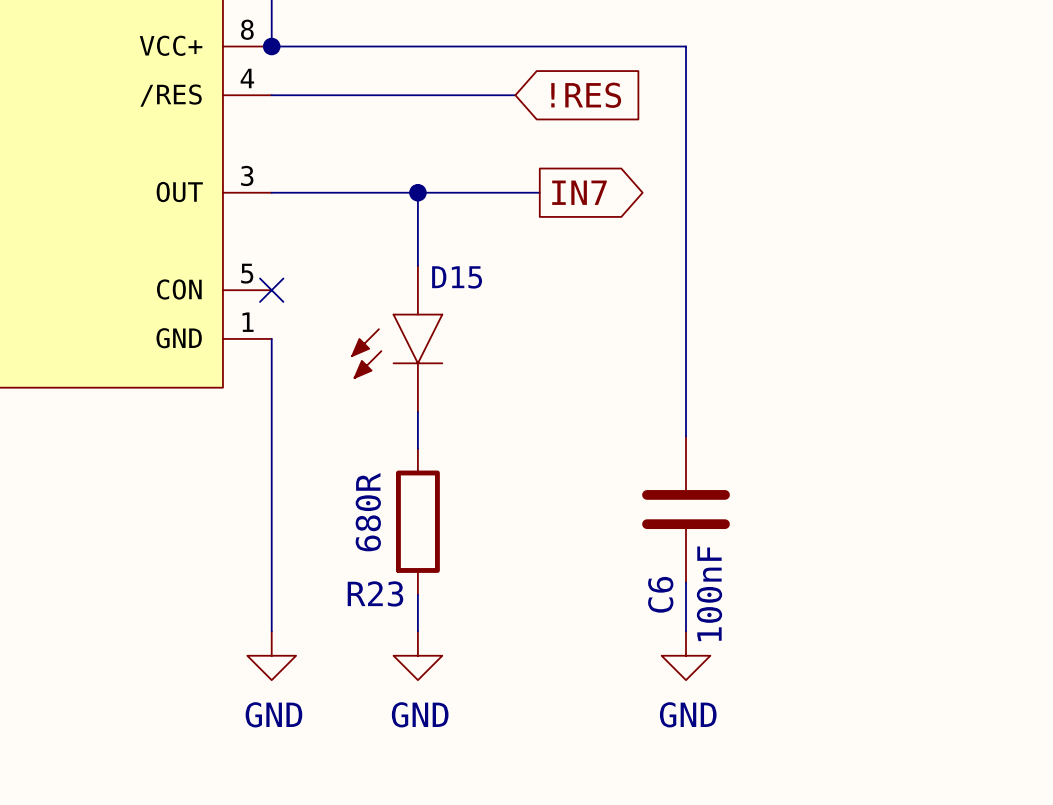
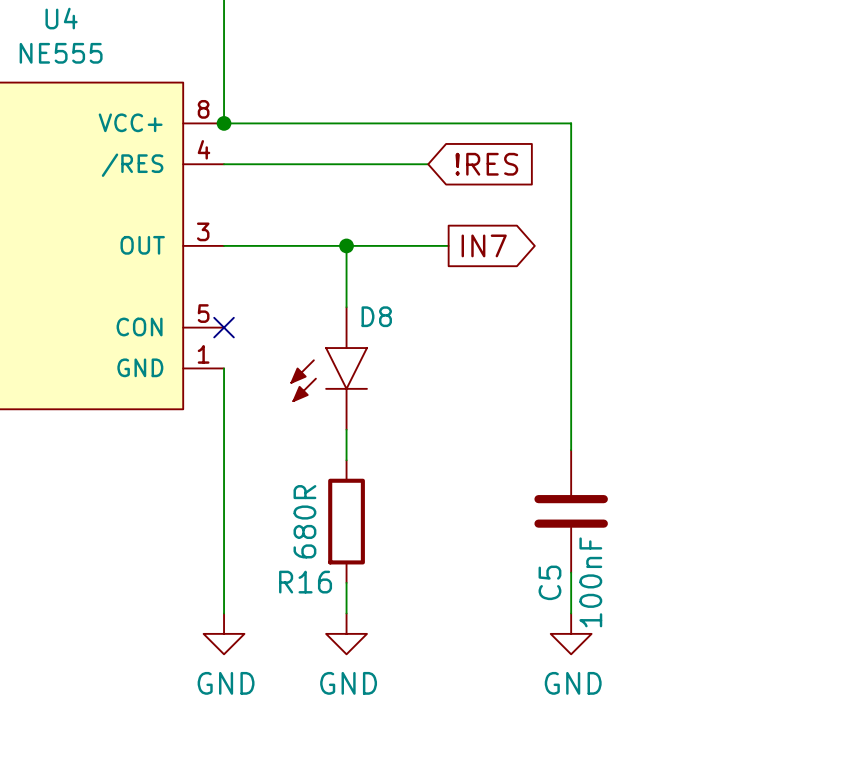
D15 name: D15 (457, 277) -> D8 (376, 316)
R23 name: R23 (375, 593) -> R16 (305, 582)
C6 name: C6 (660, 594) -> C5 (549, 582)

